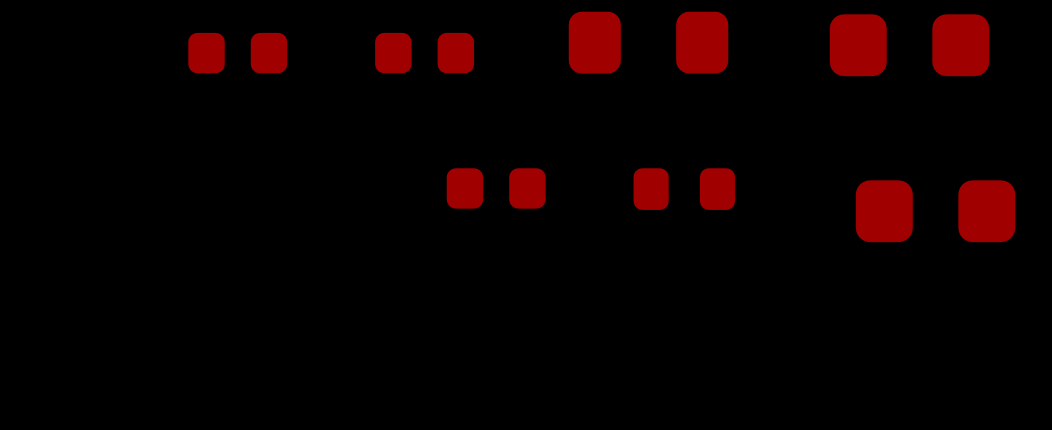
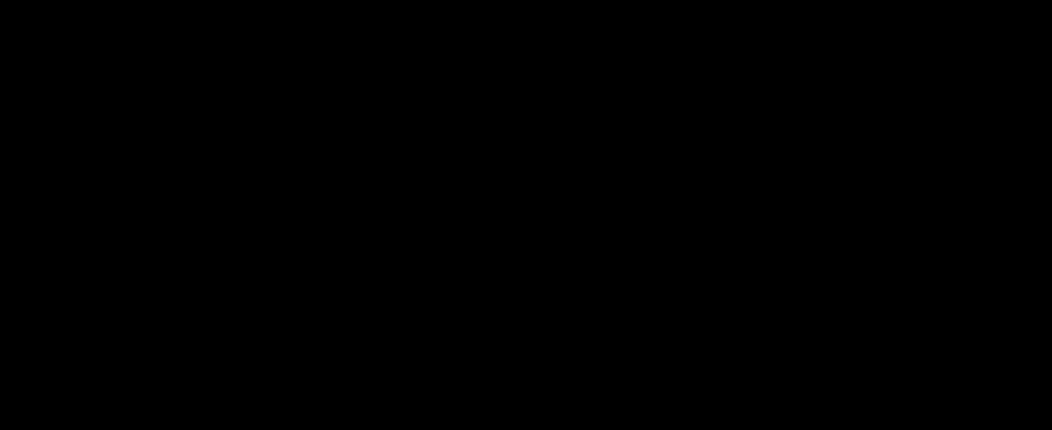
part: (648, 42) -> none
part: (909, 45) -> none
part: (237, 53) -> none
part: (424, 53) -> none
part: (496, 188) -> none
part: (684, 189) -> none
part: (935, 211) -> none

